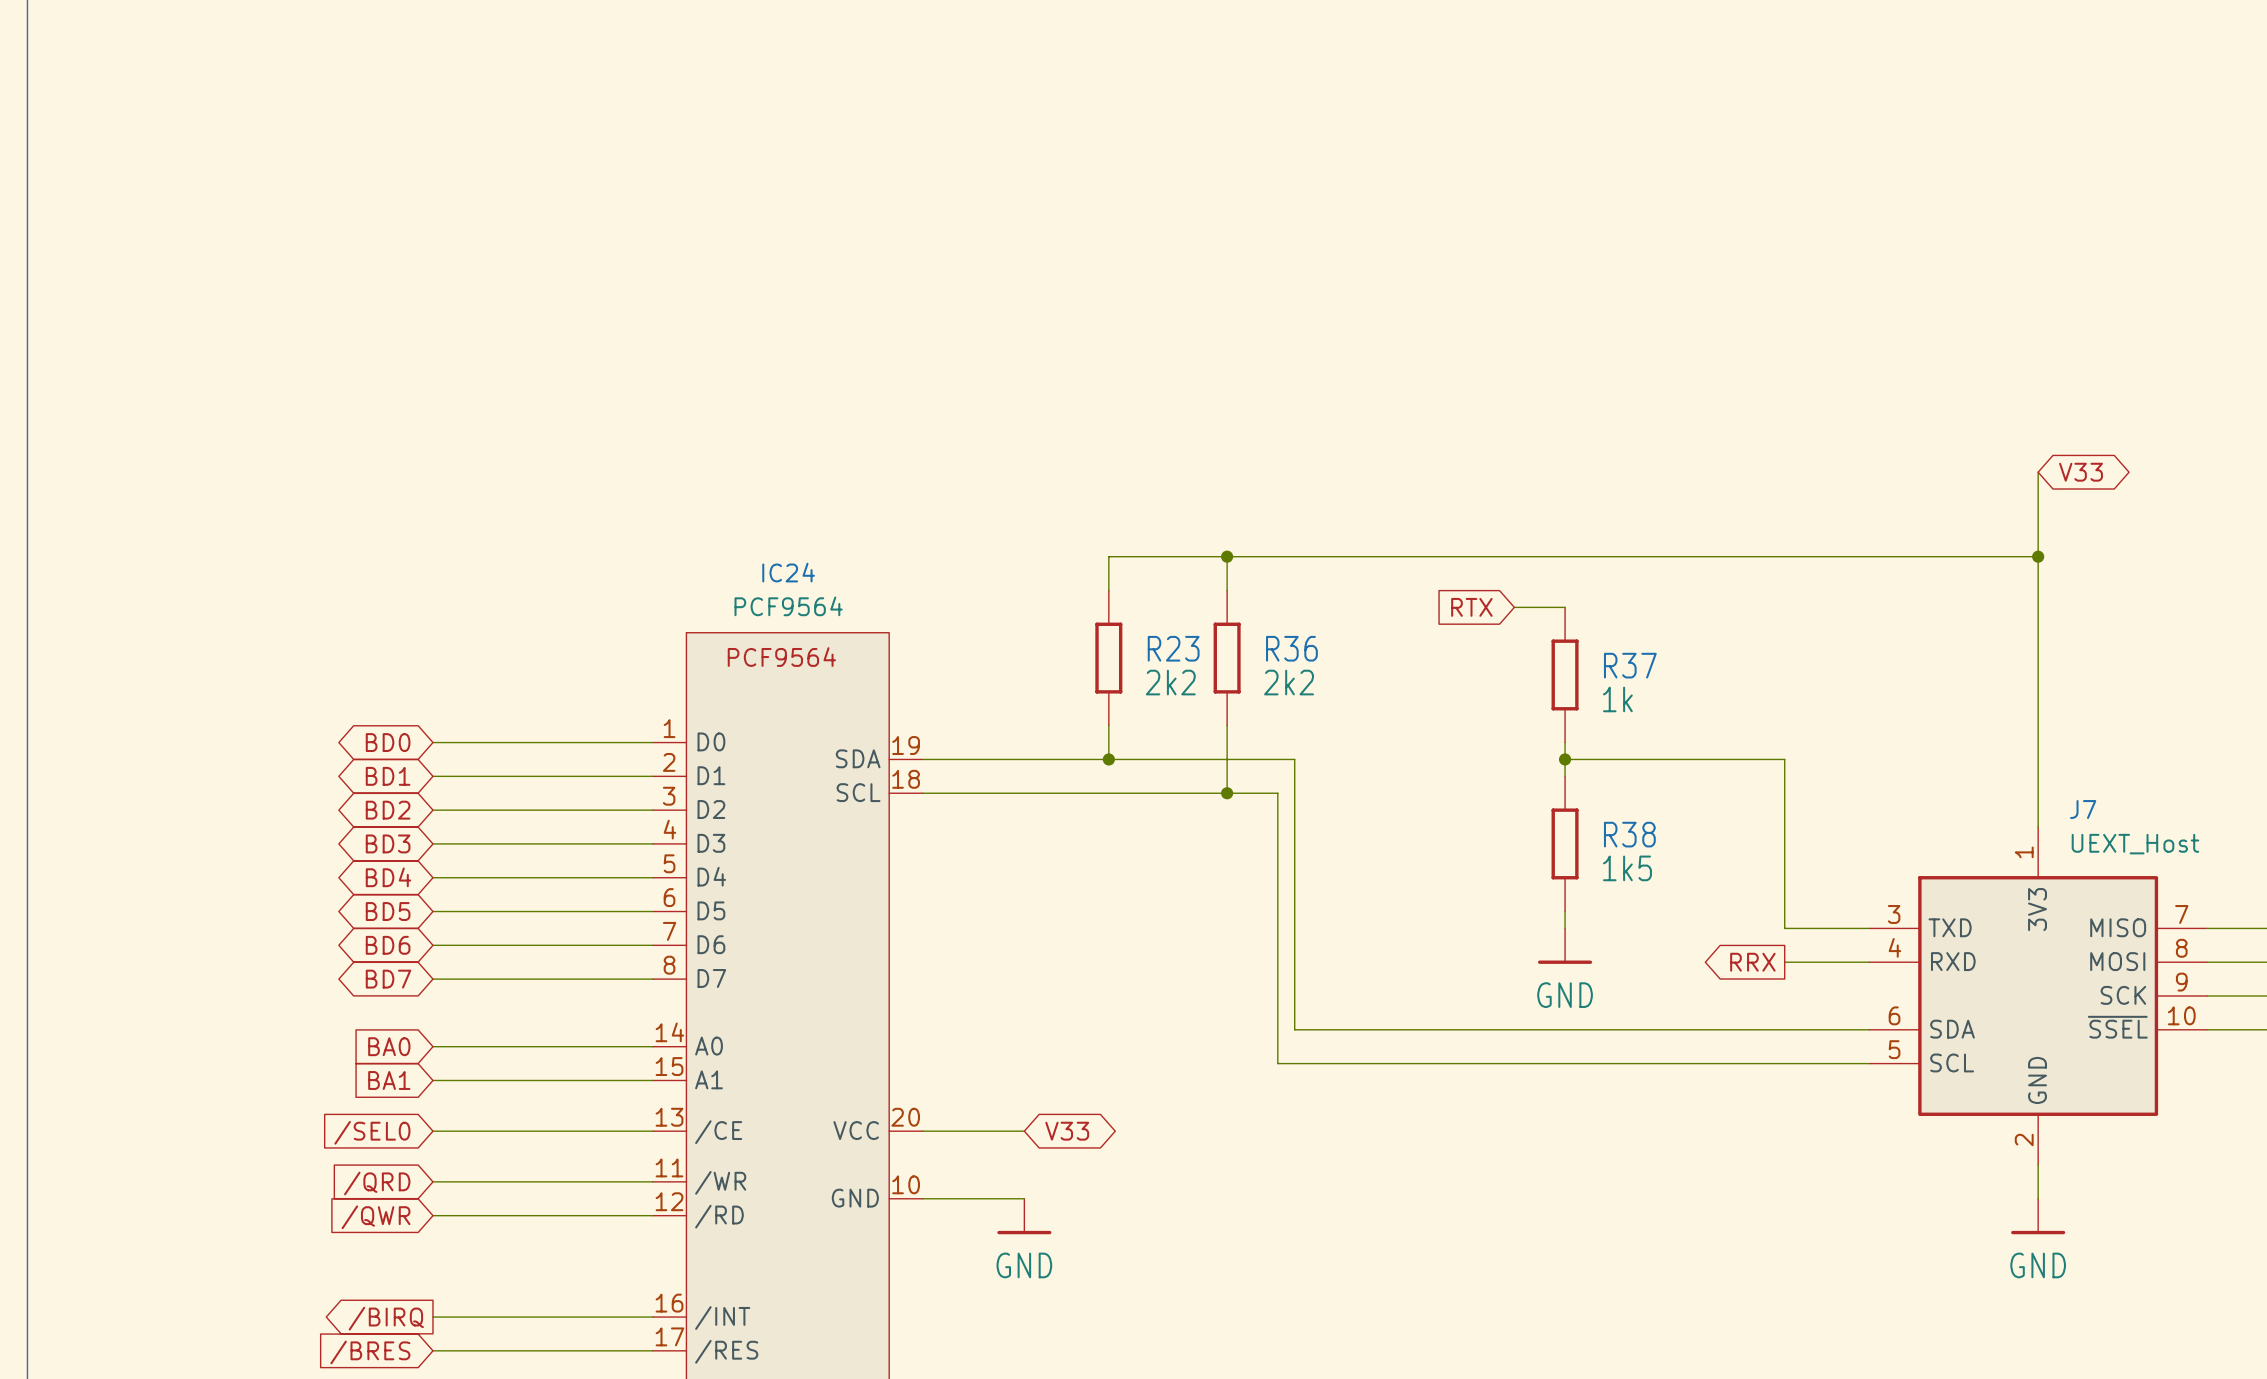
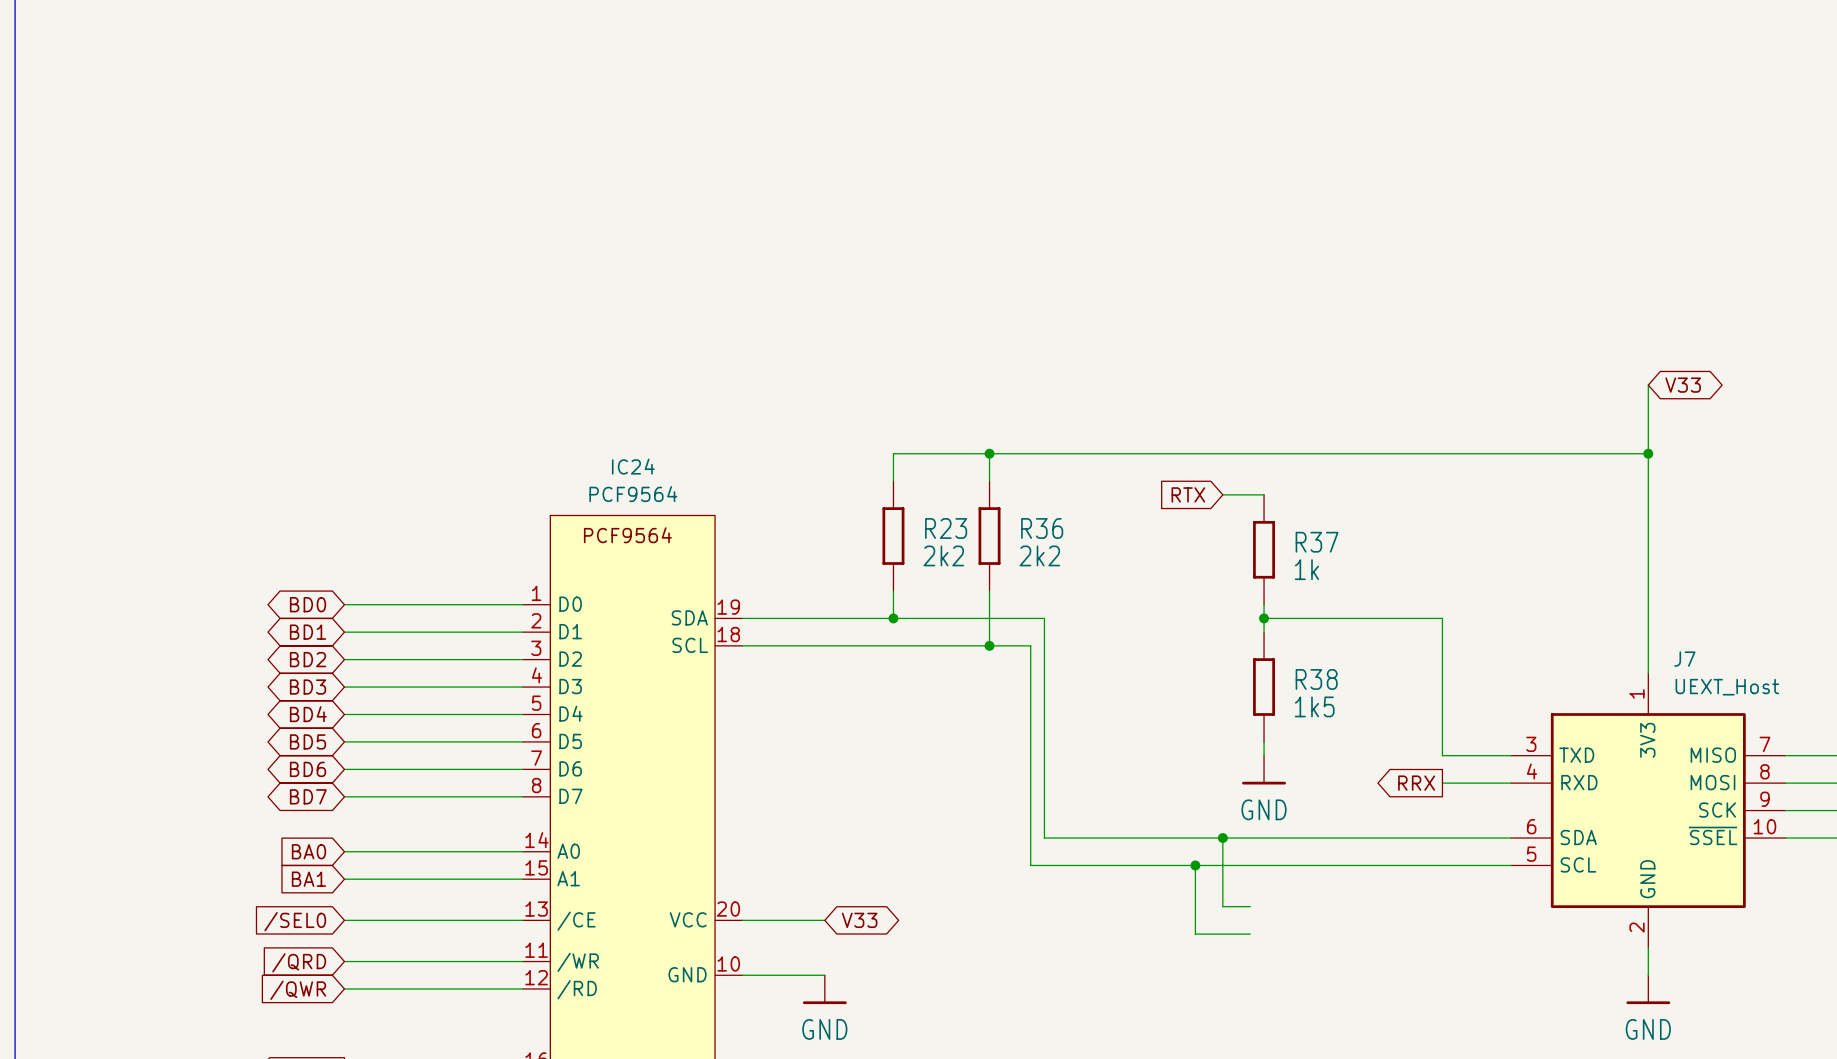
wire: none -> (1222, 838) (1222, 906) (1250, 906)
junction: none -> (1222, 838)
wire: none -> (1195, 865) (1195, 934) (1250, 934)
junction: none -> (1195, 865)

